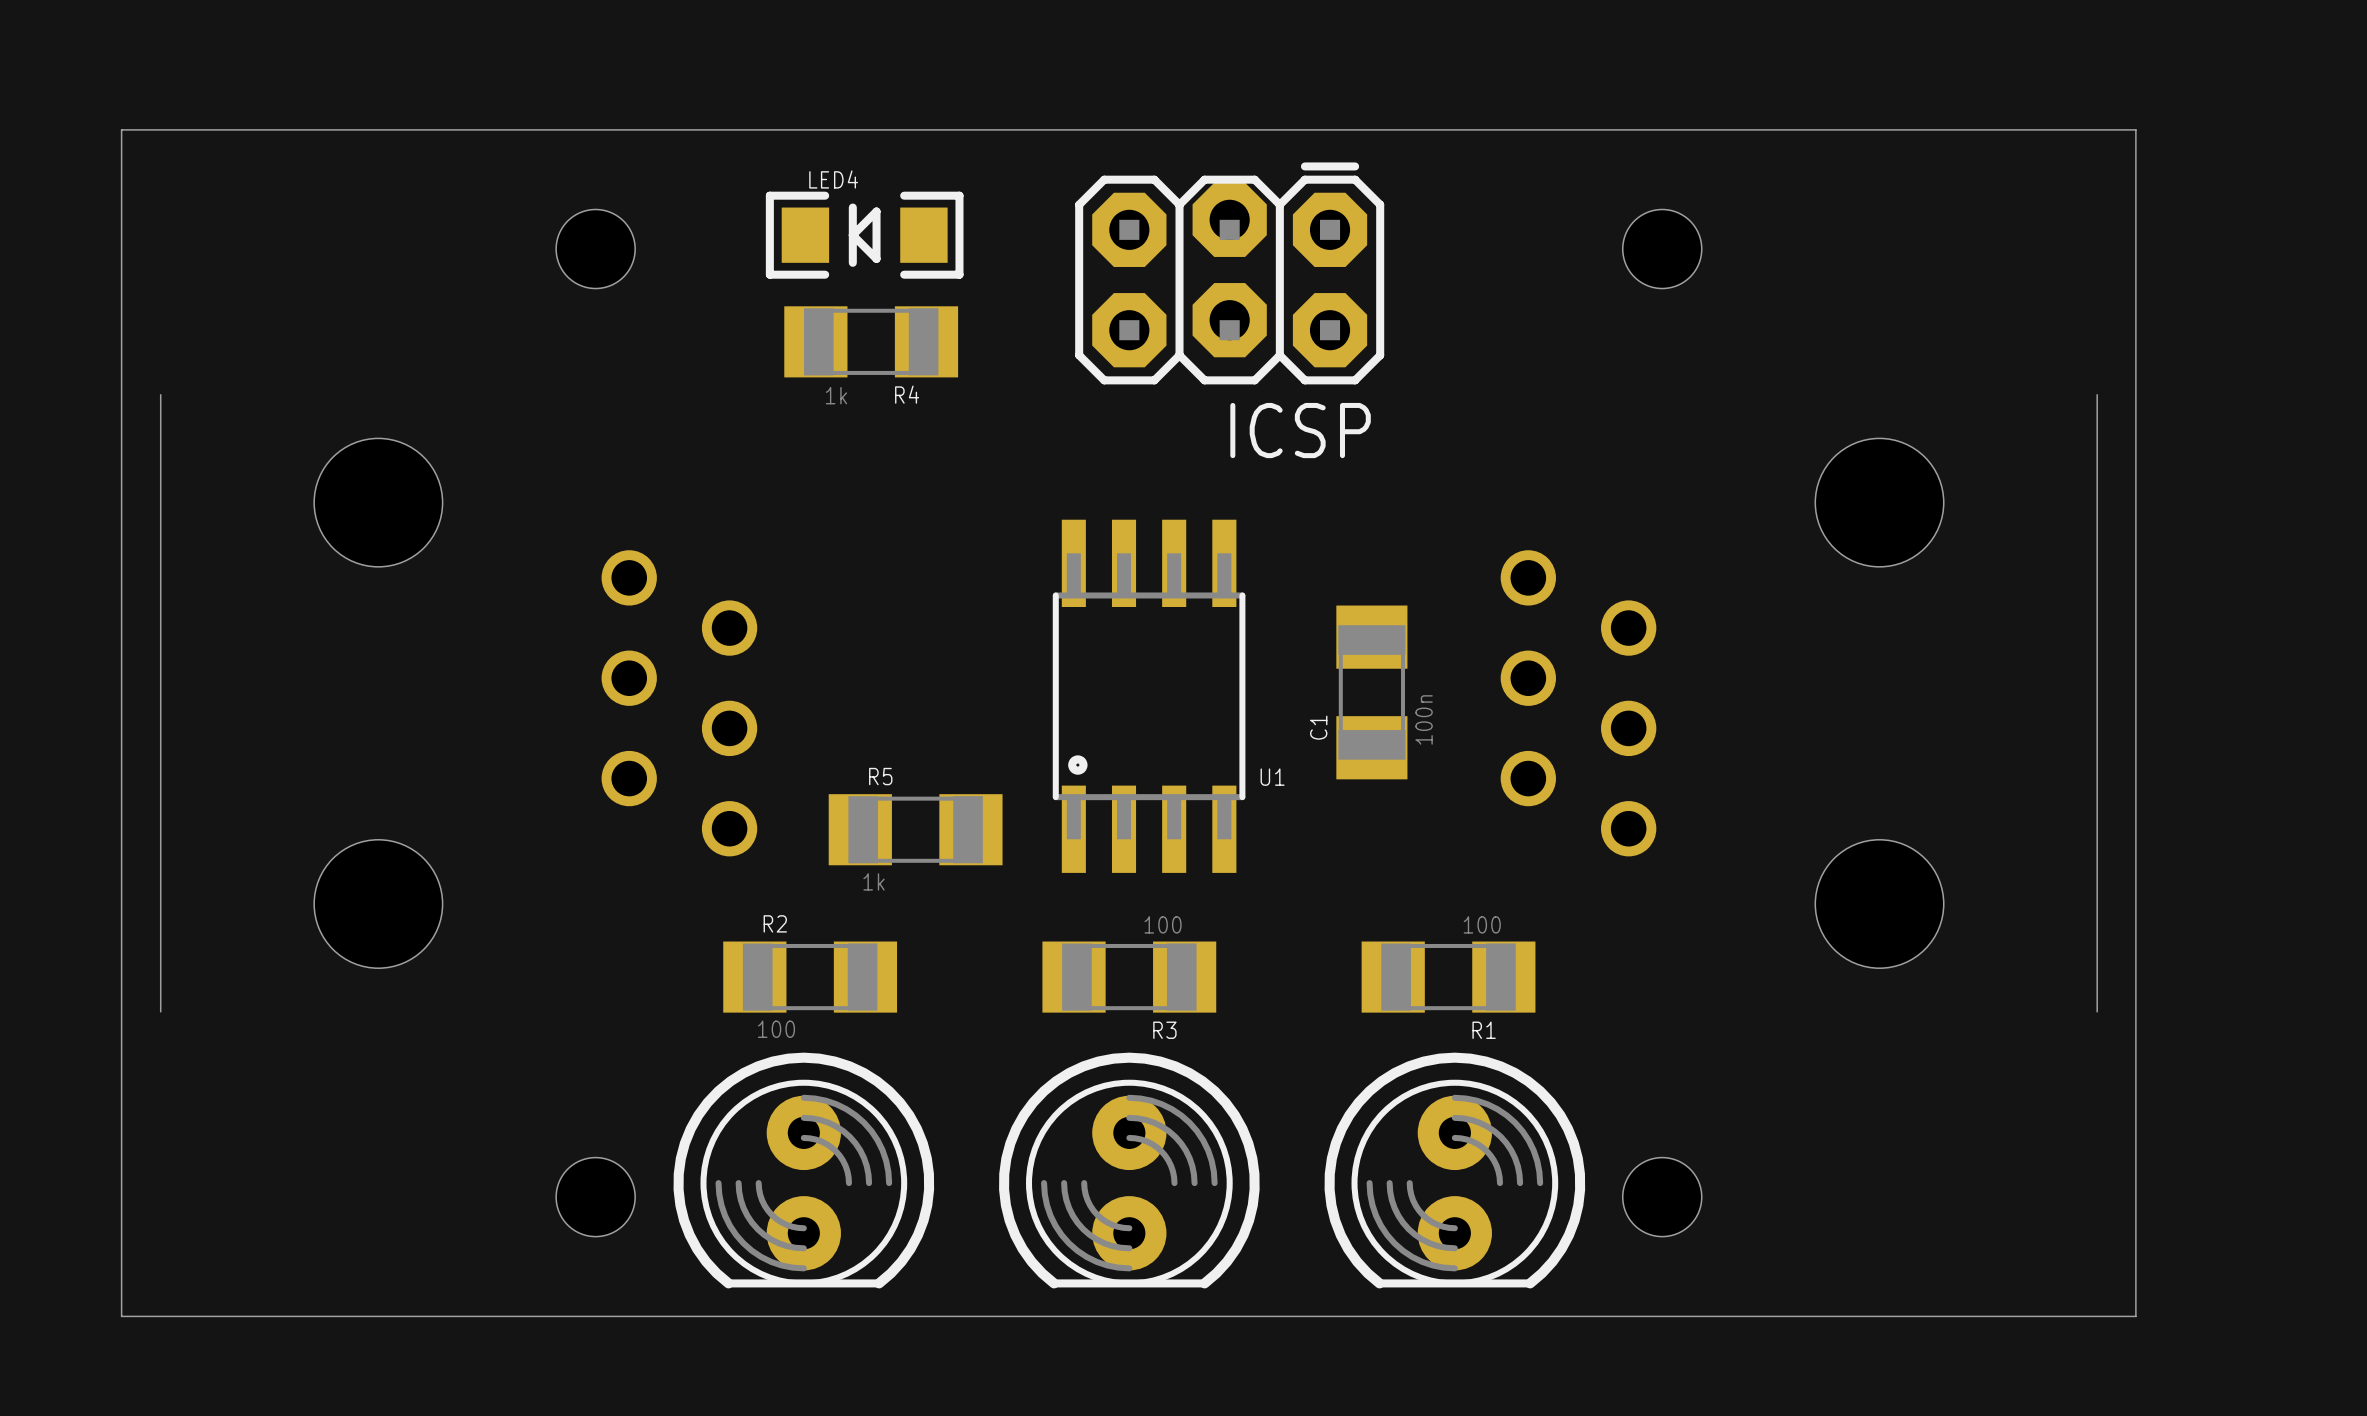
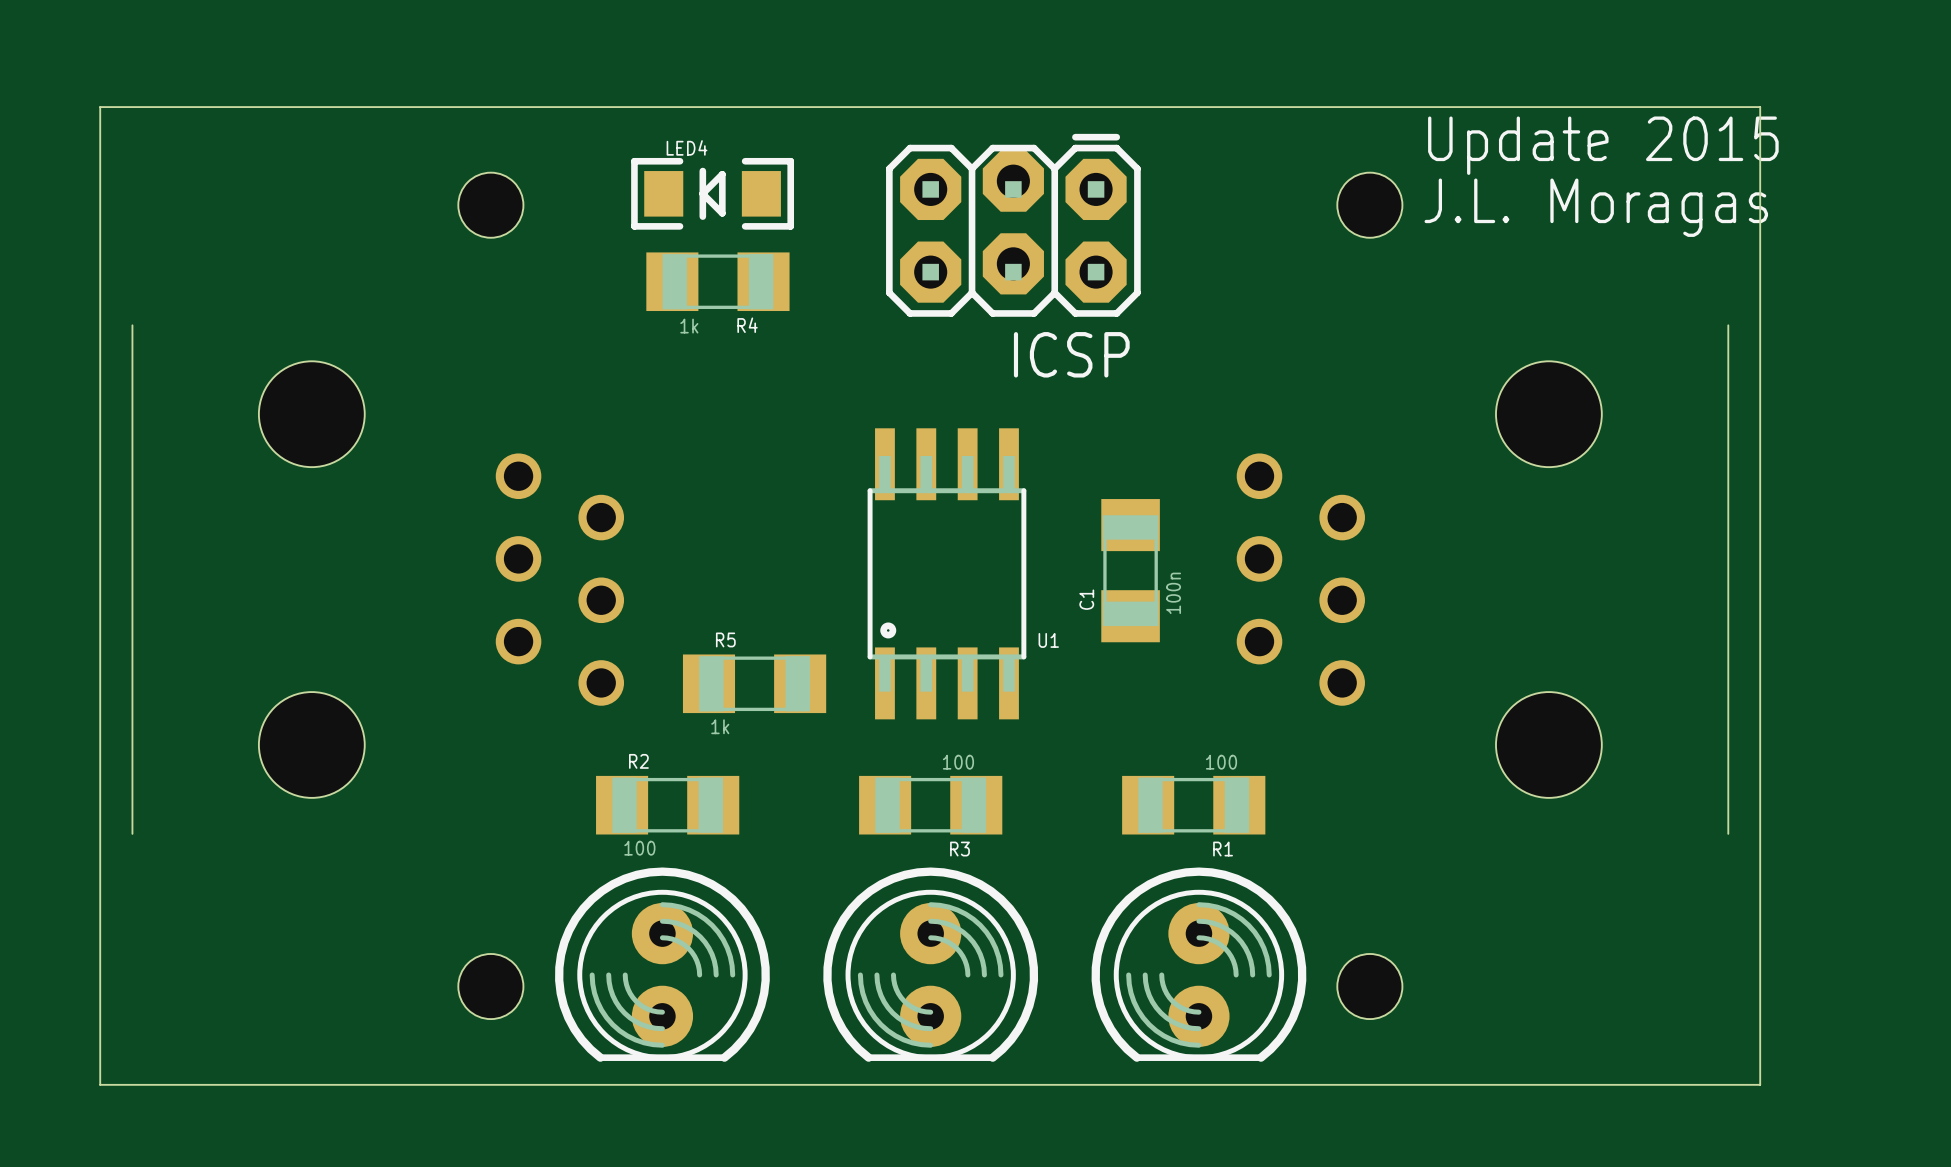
text: none -> Update 2015 (1603, 145)
text: none -> J.L. Moragas (1596, 207)

